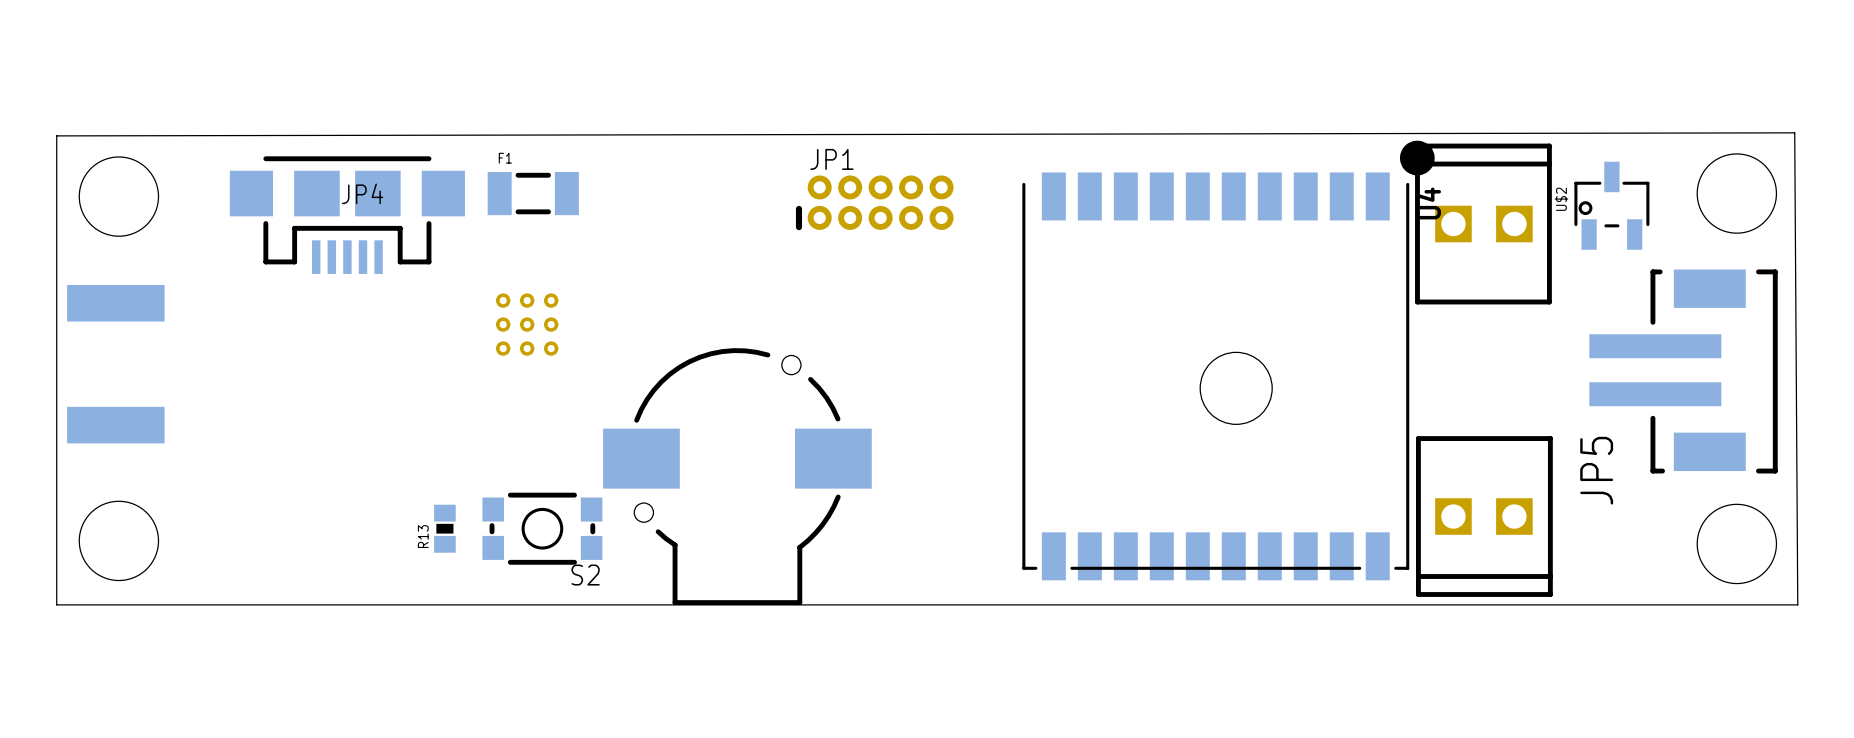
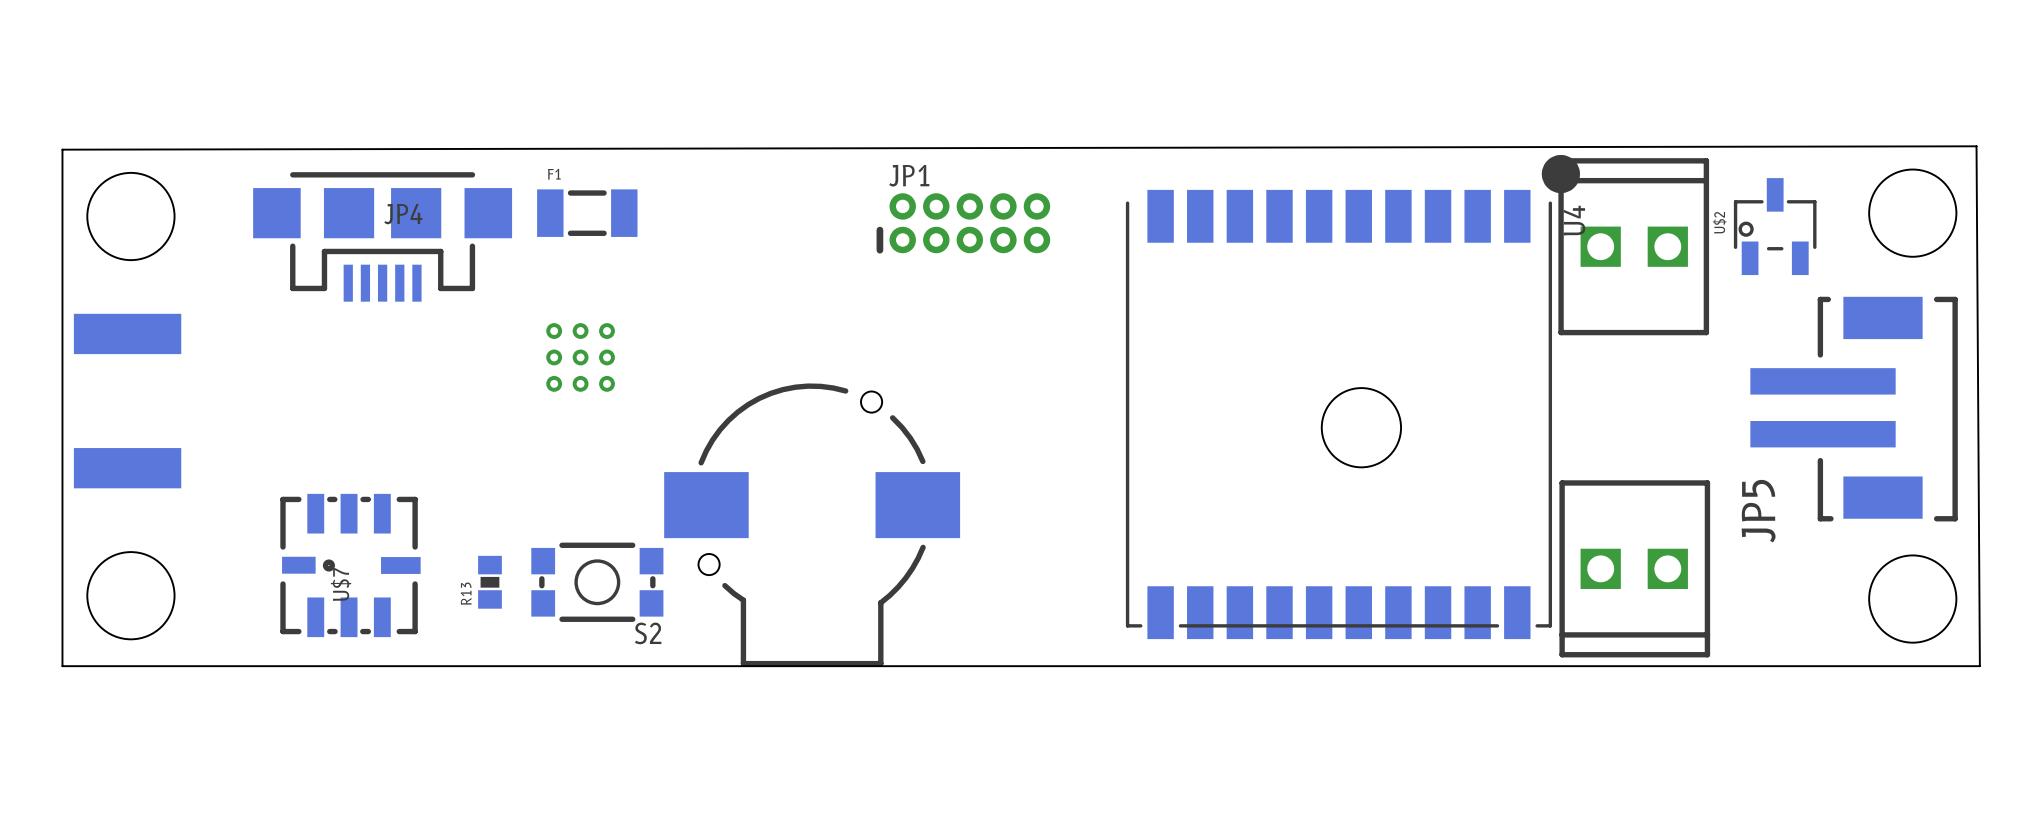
U$7: none -> (350, 565)

